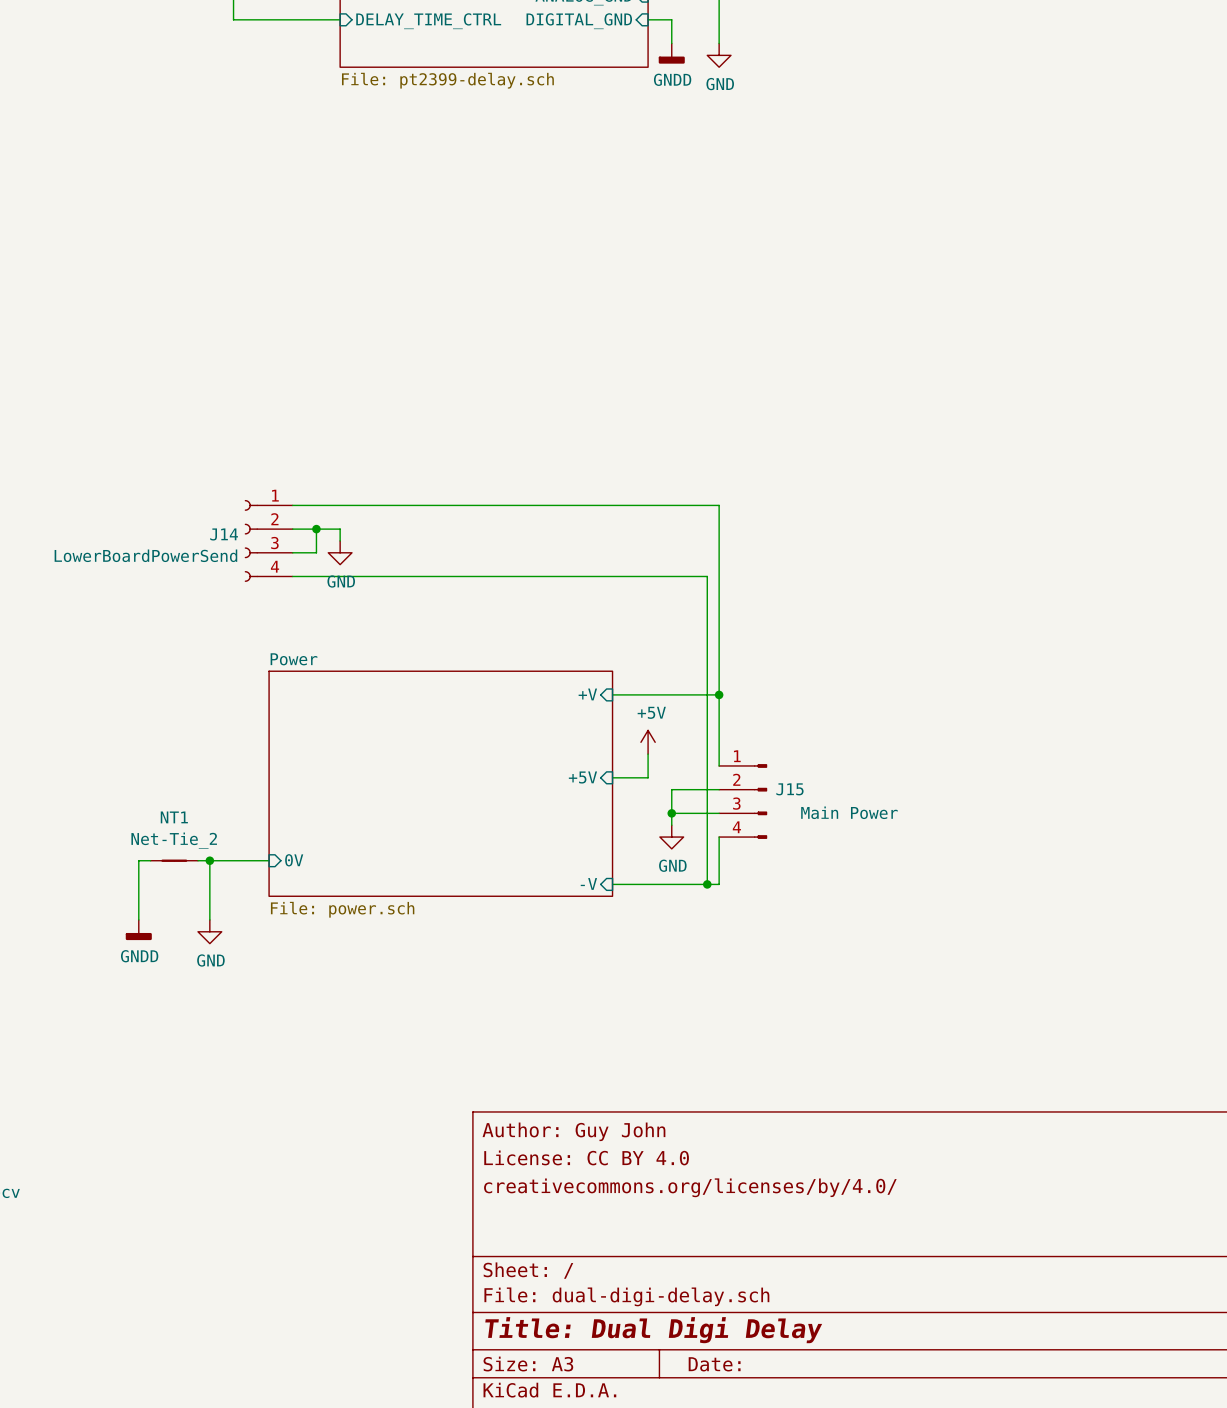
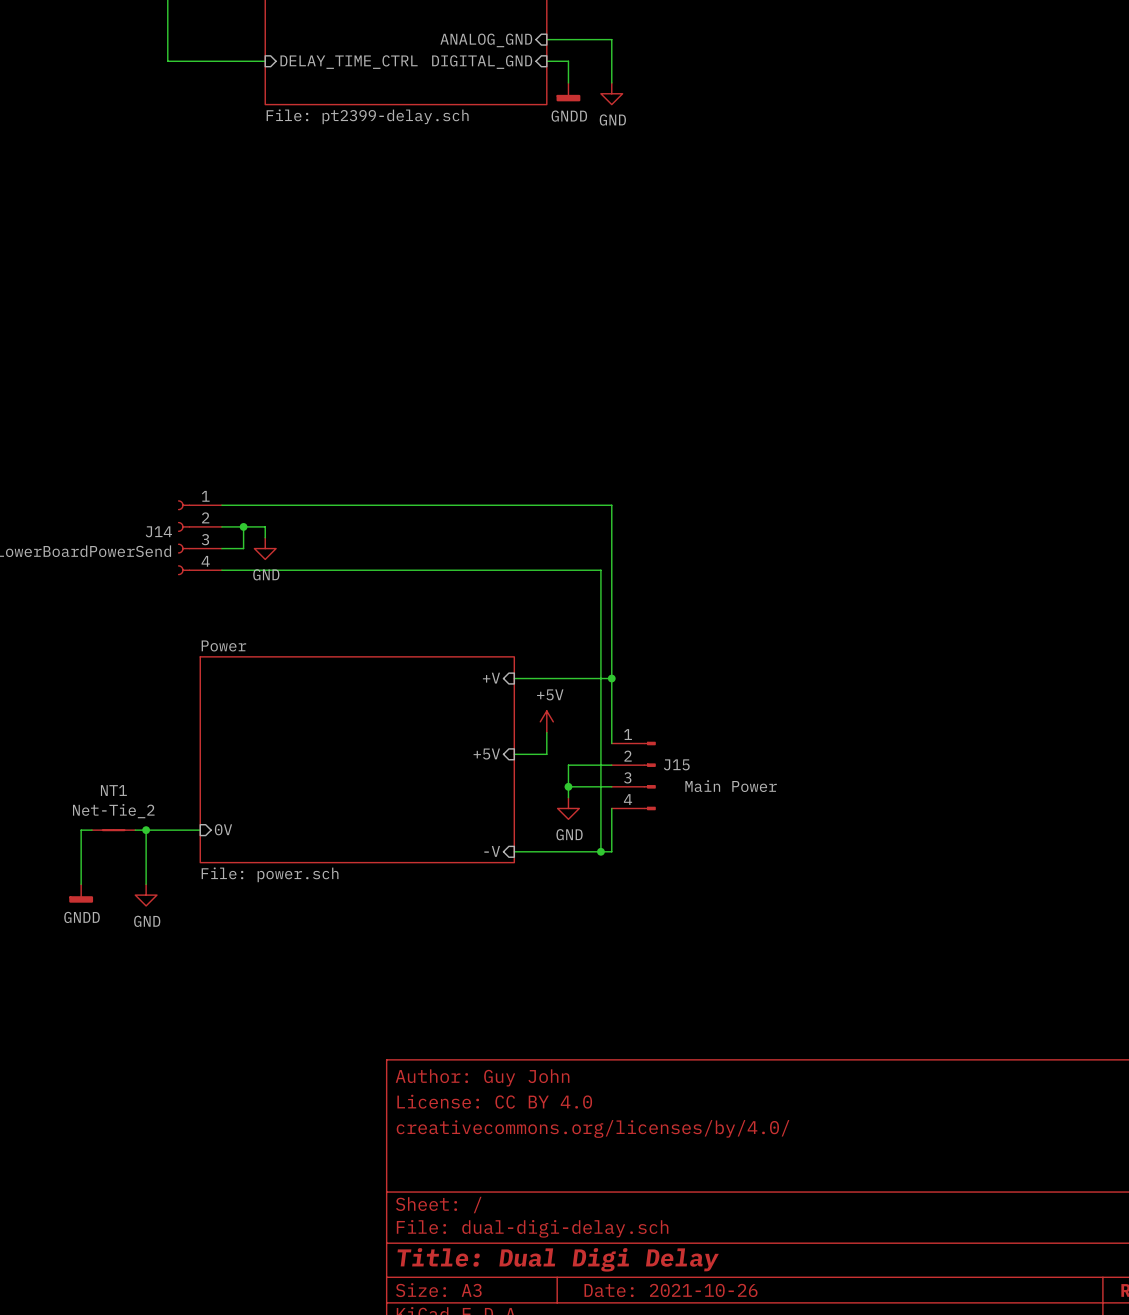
title block: Date: (714, 1364) -> Date: 2021-10-26 (671, 1290)

